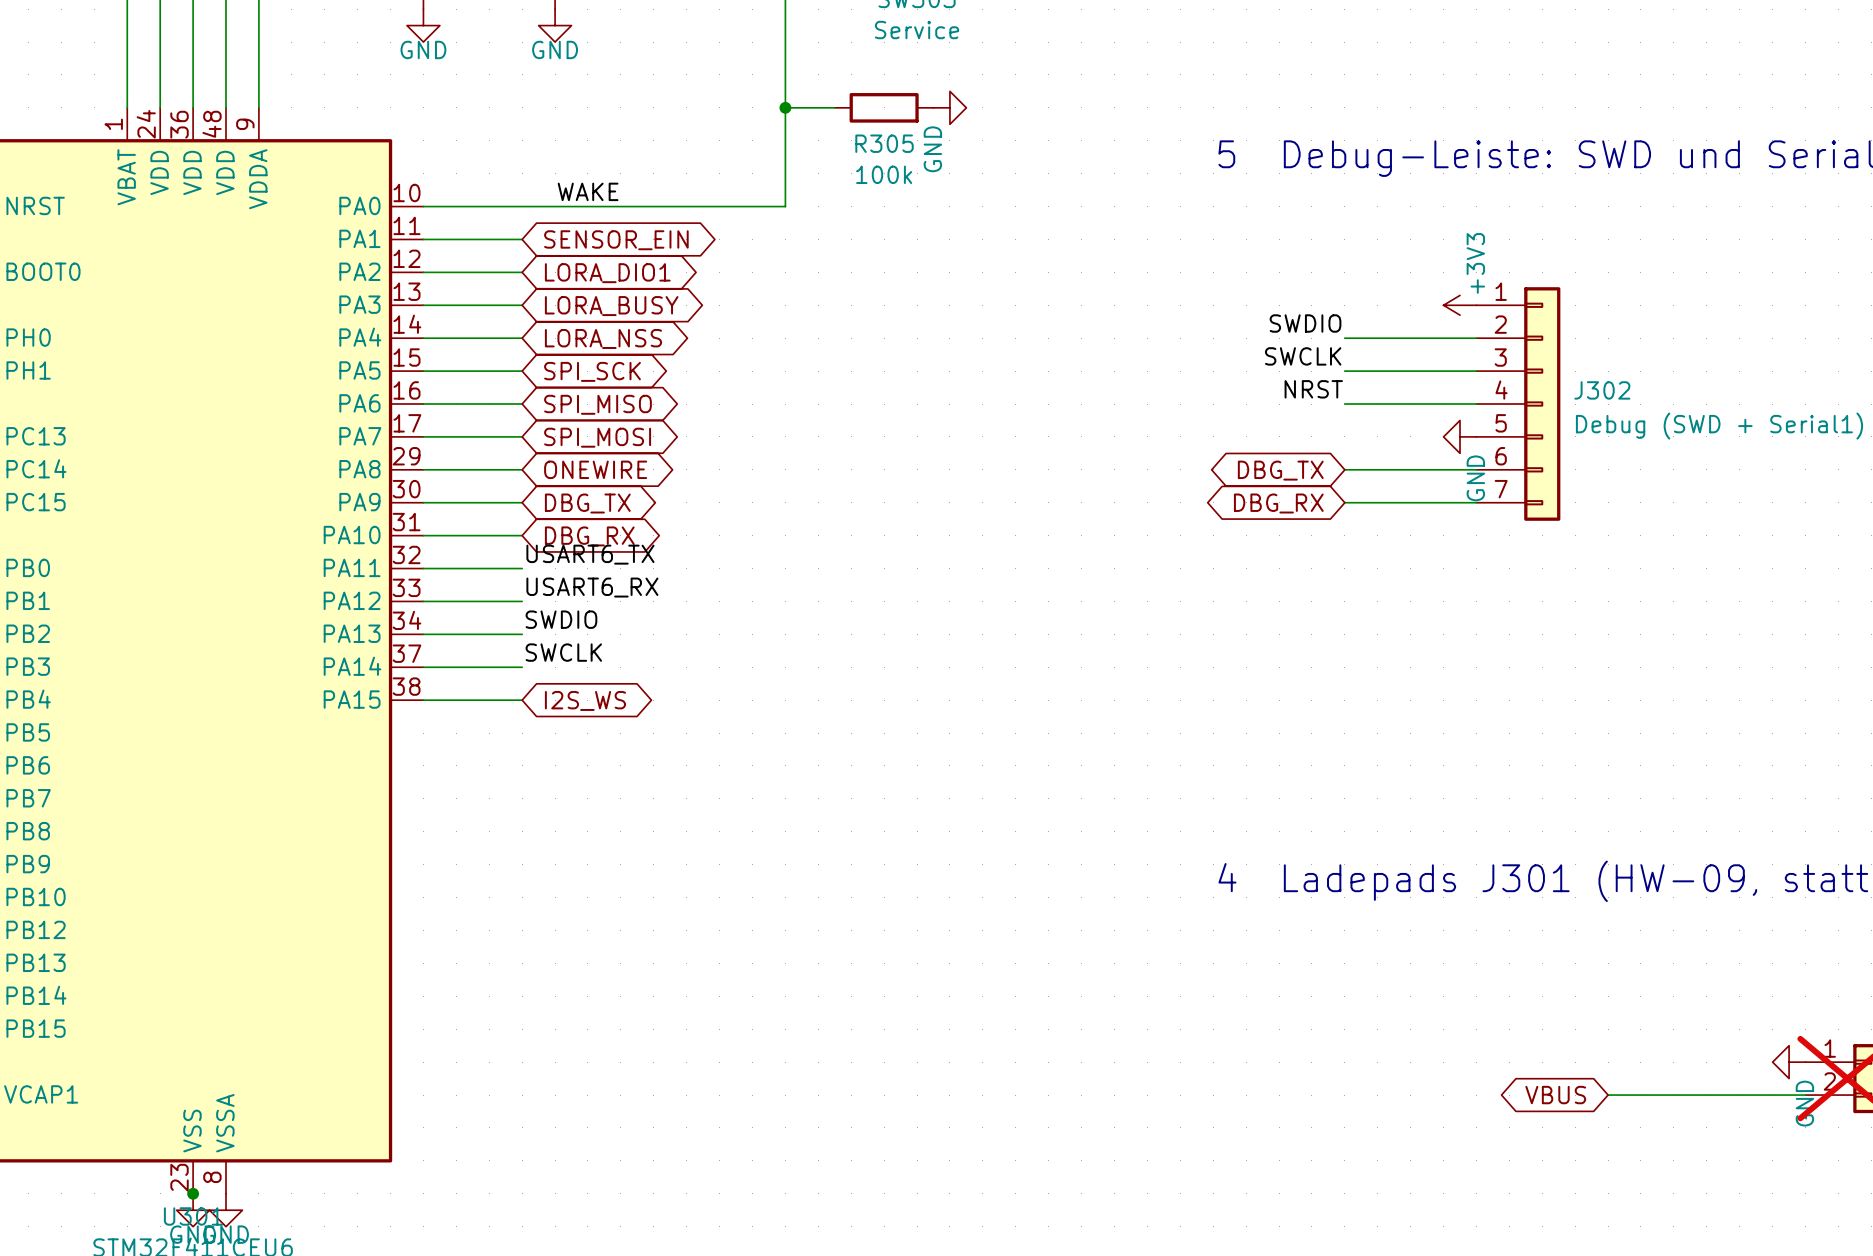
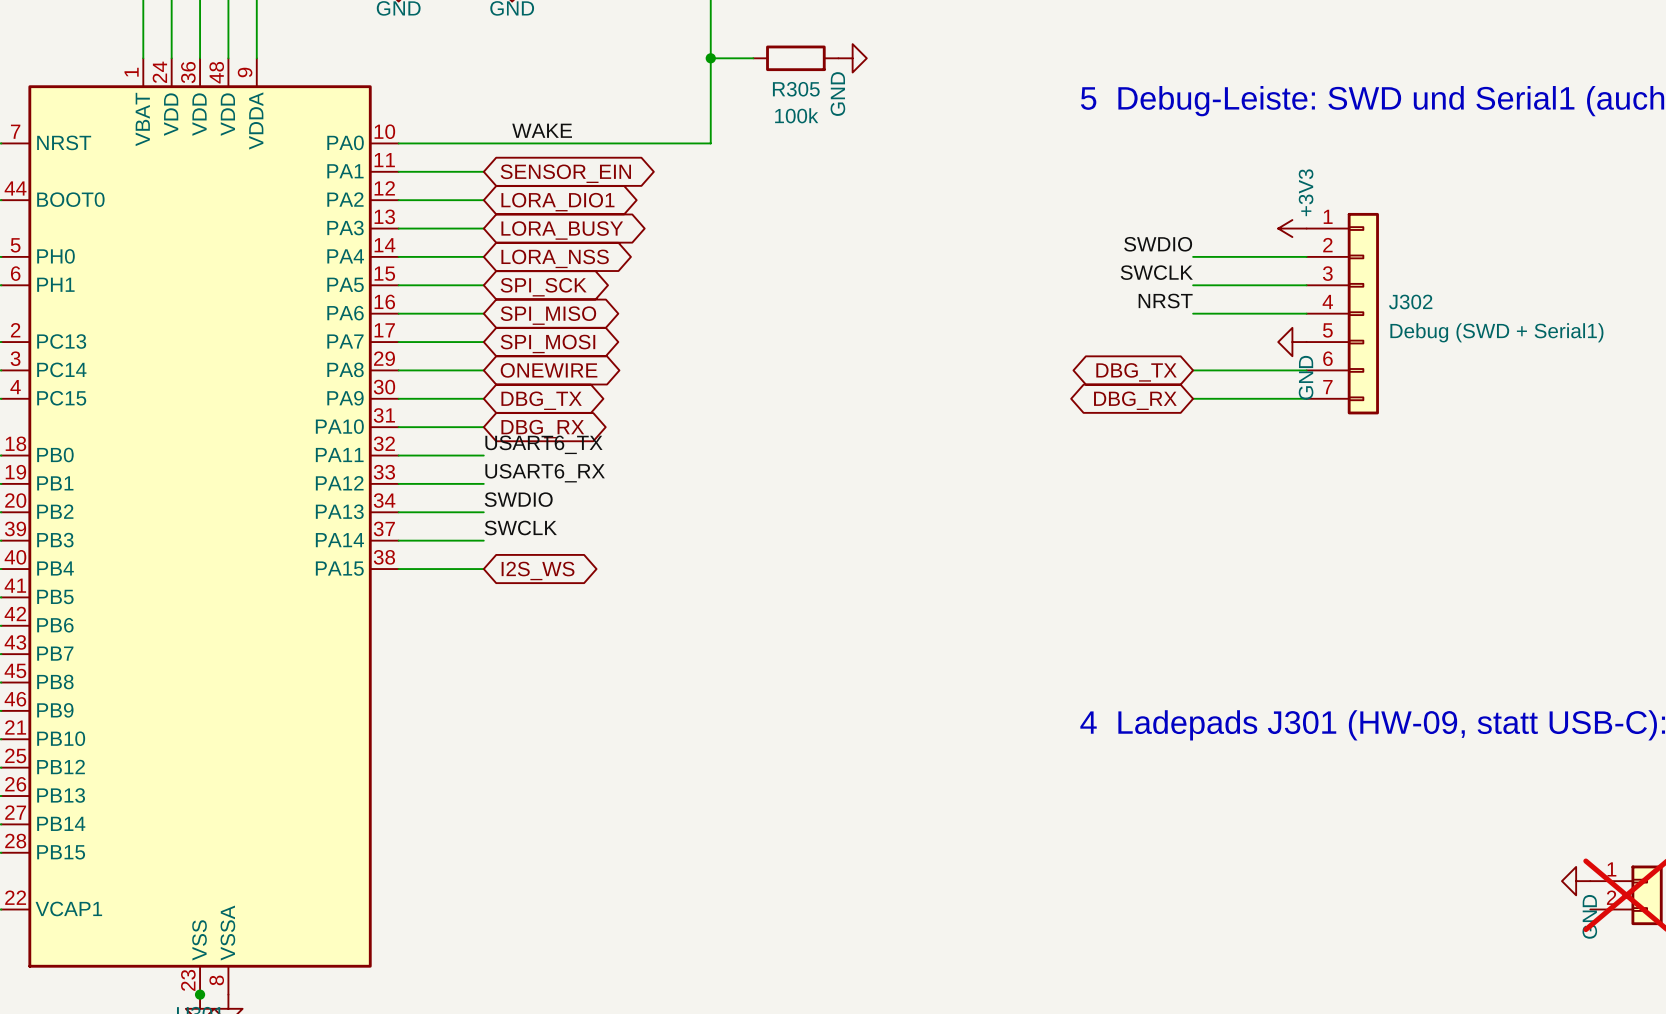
global label: VBUS (1555, 1095) -> none
wire: (1608, 1095) (1805, 1095) -> none

